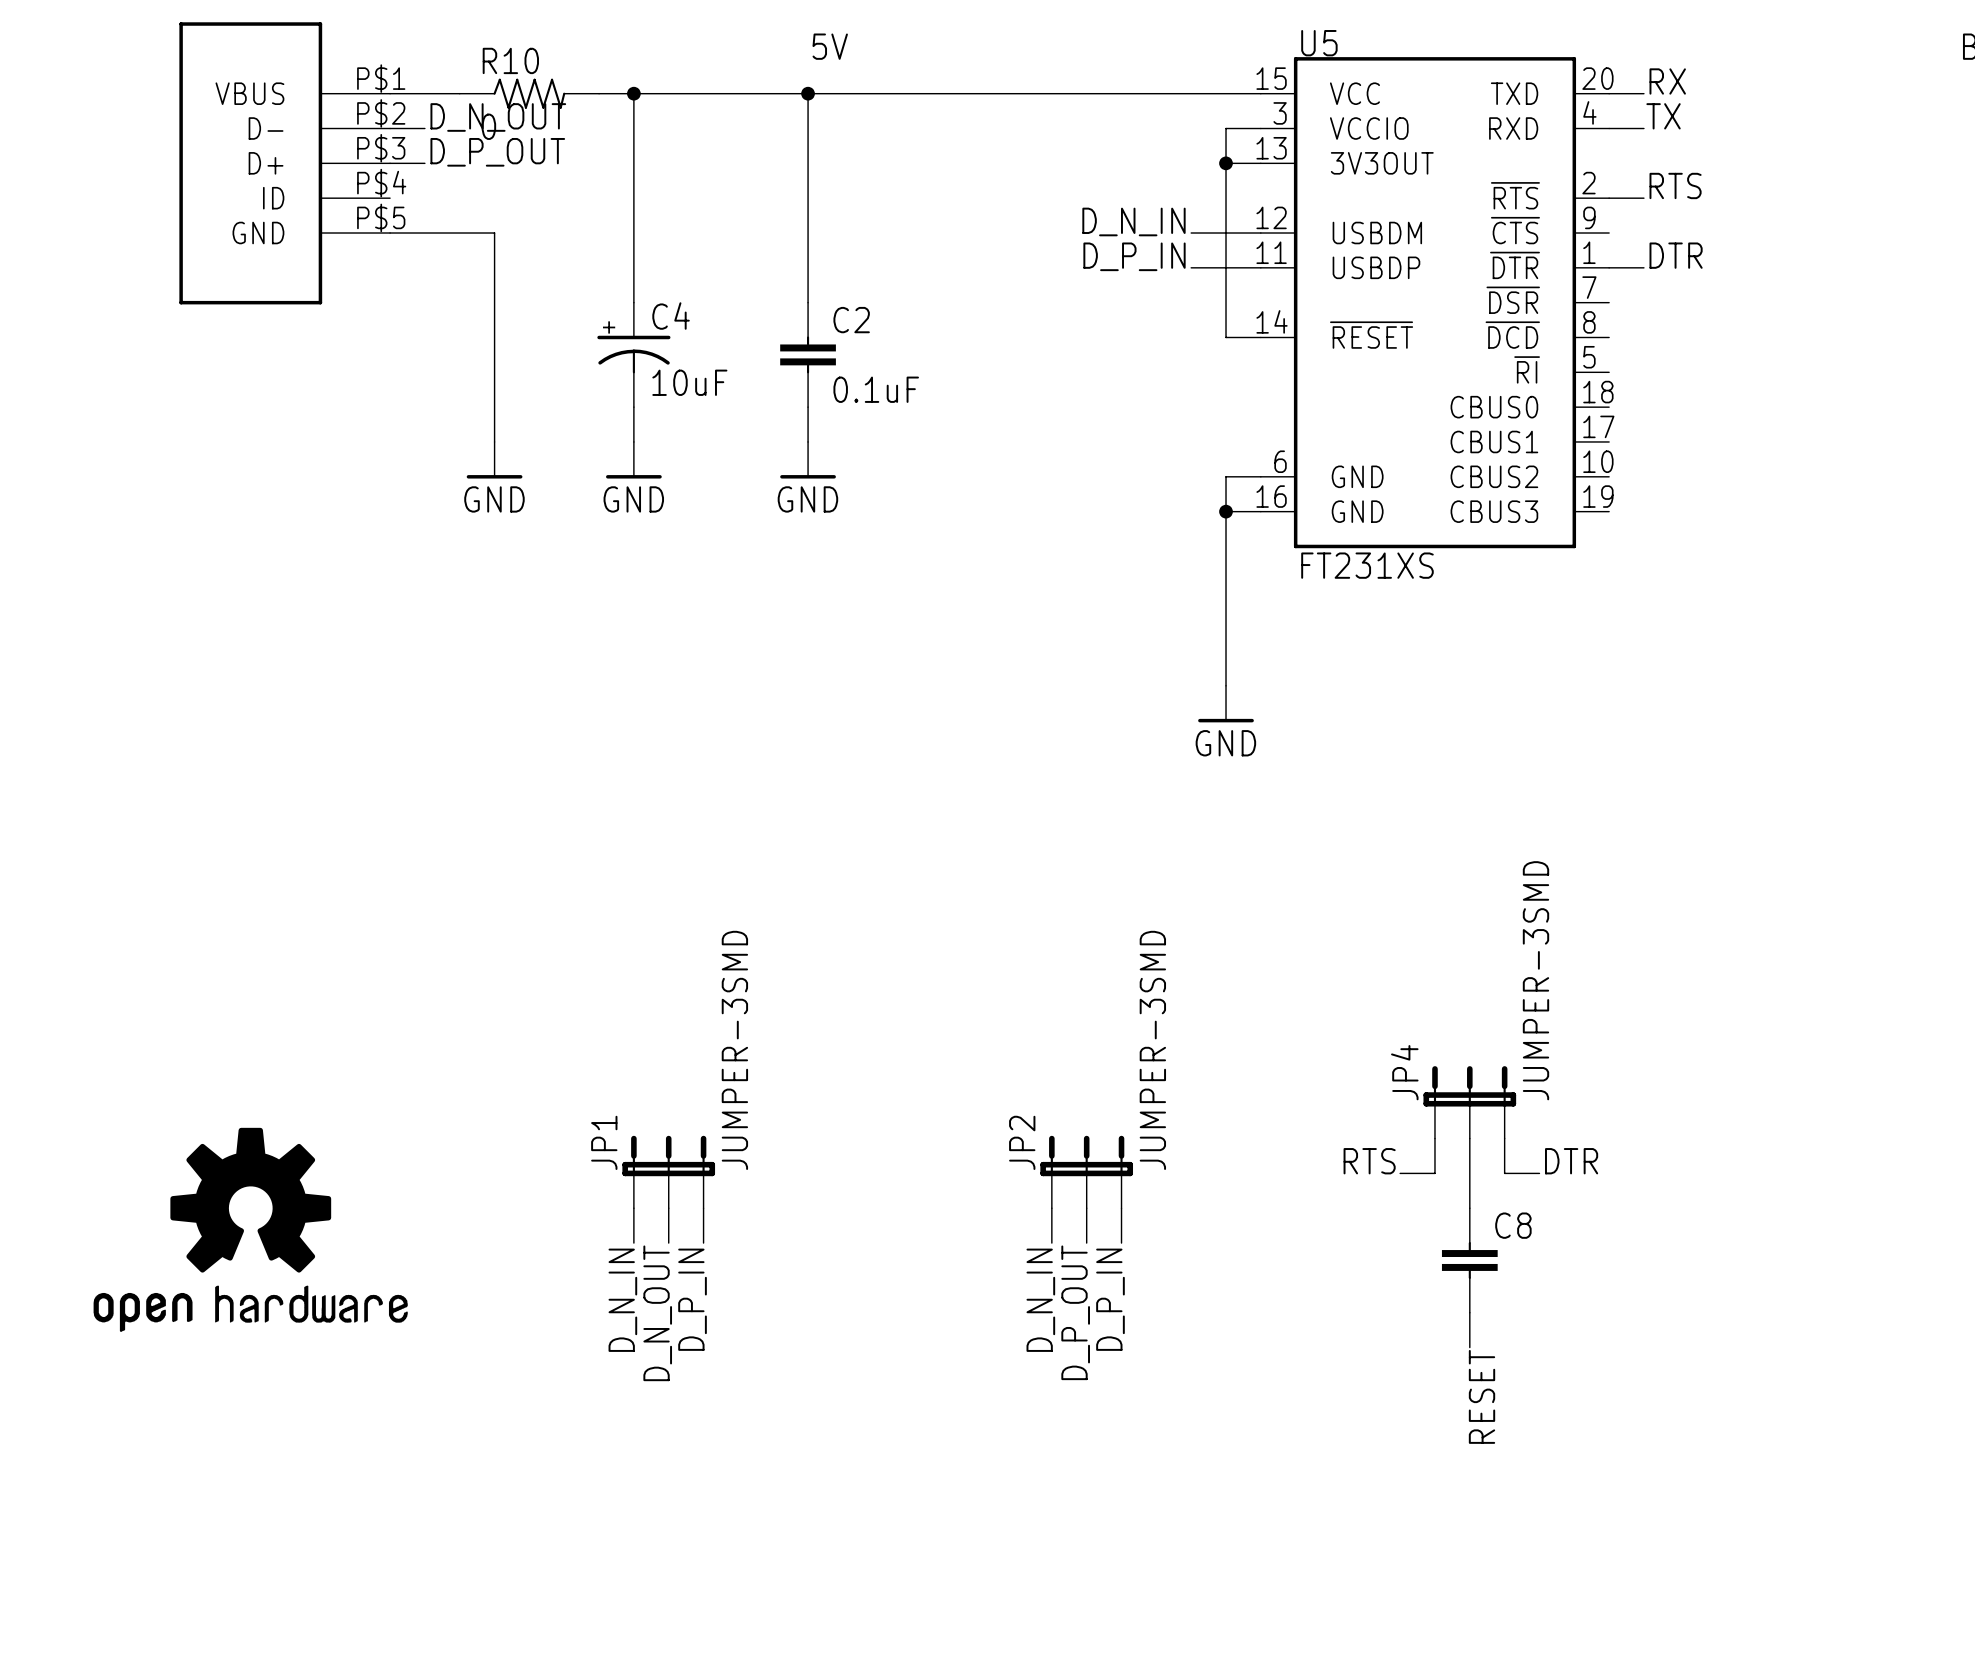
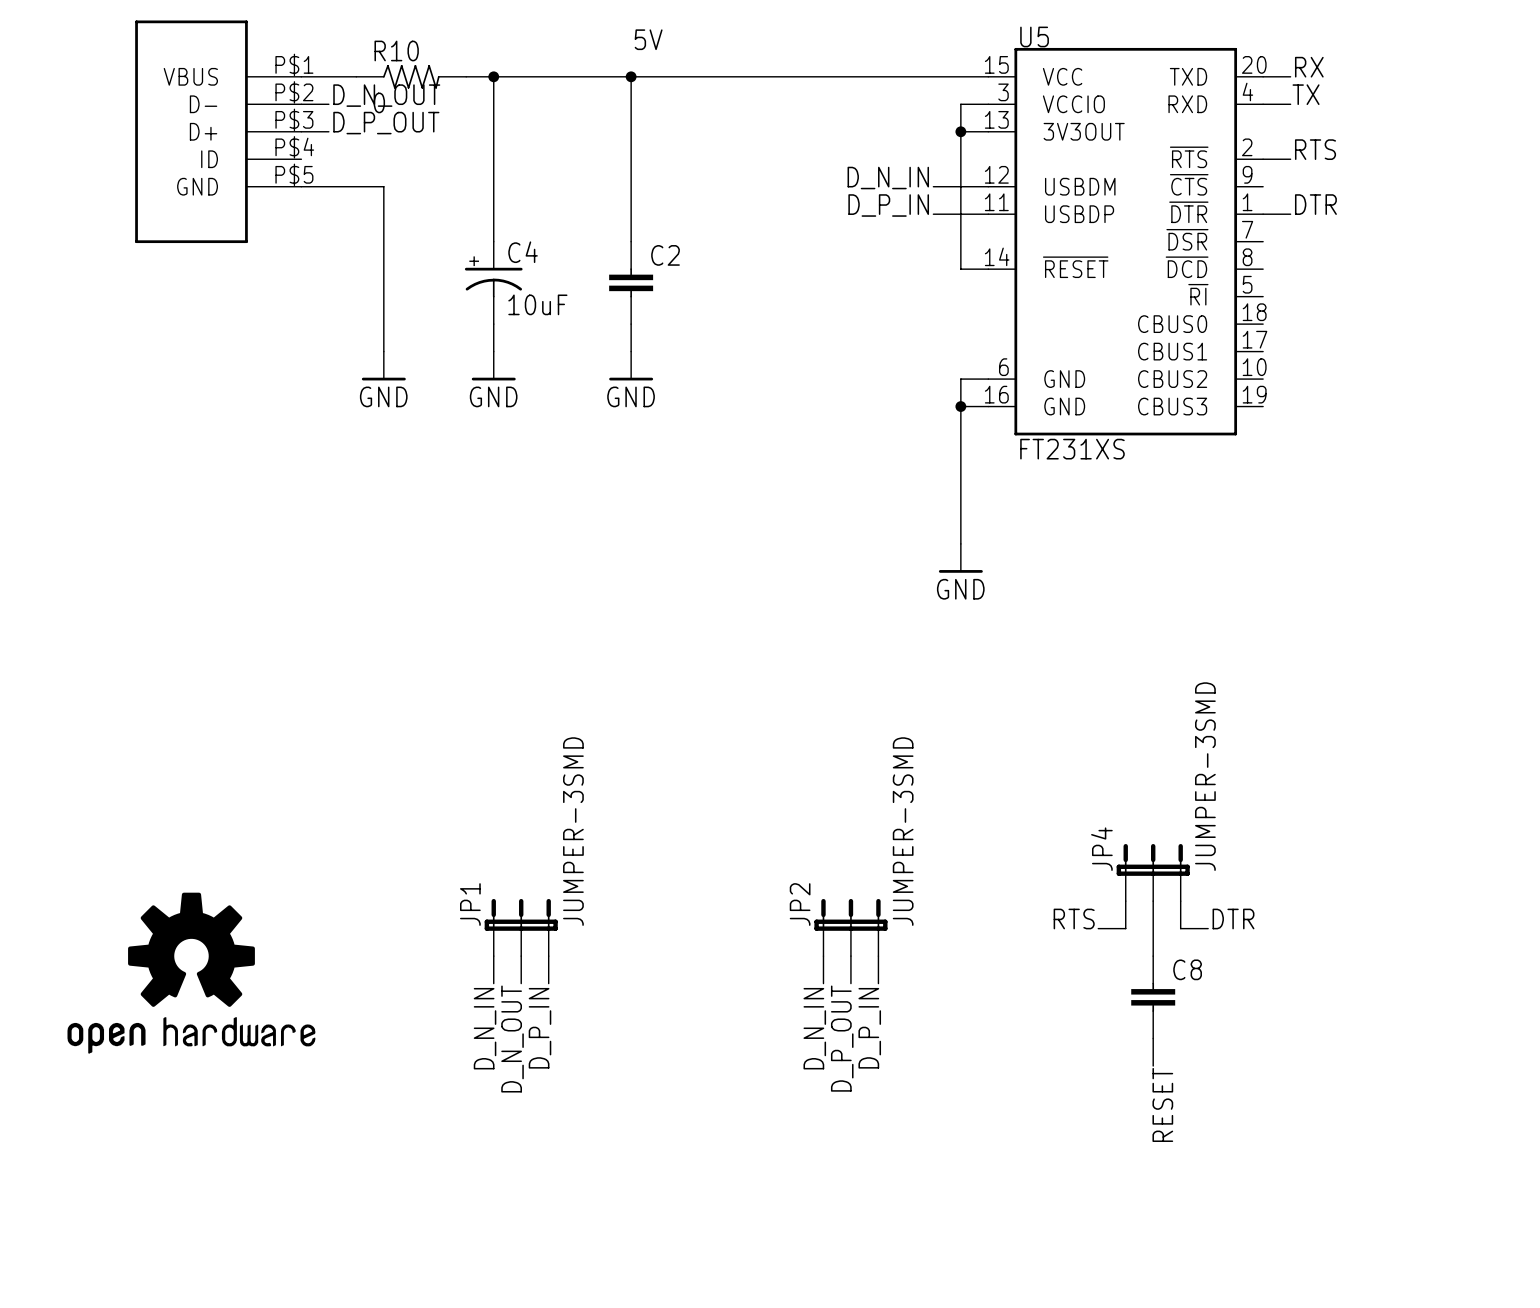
C2 value: 0.1uF (876, 389) -> none

